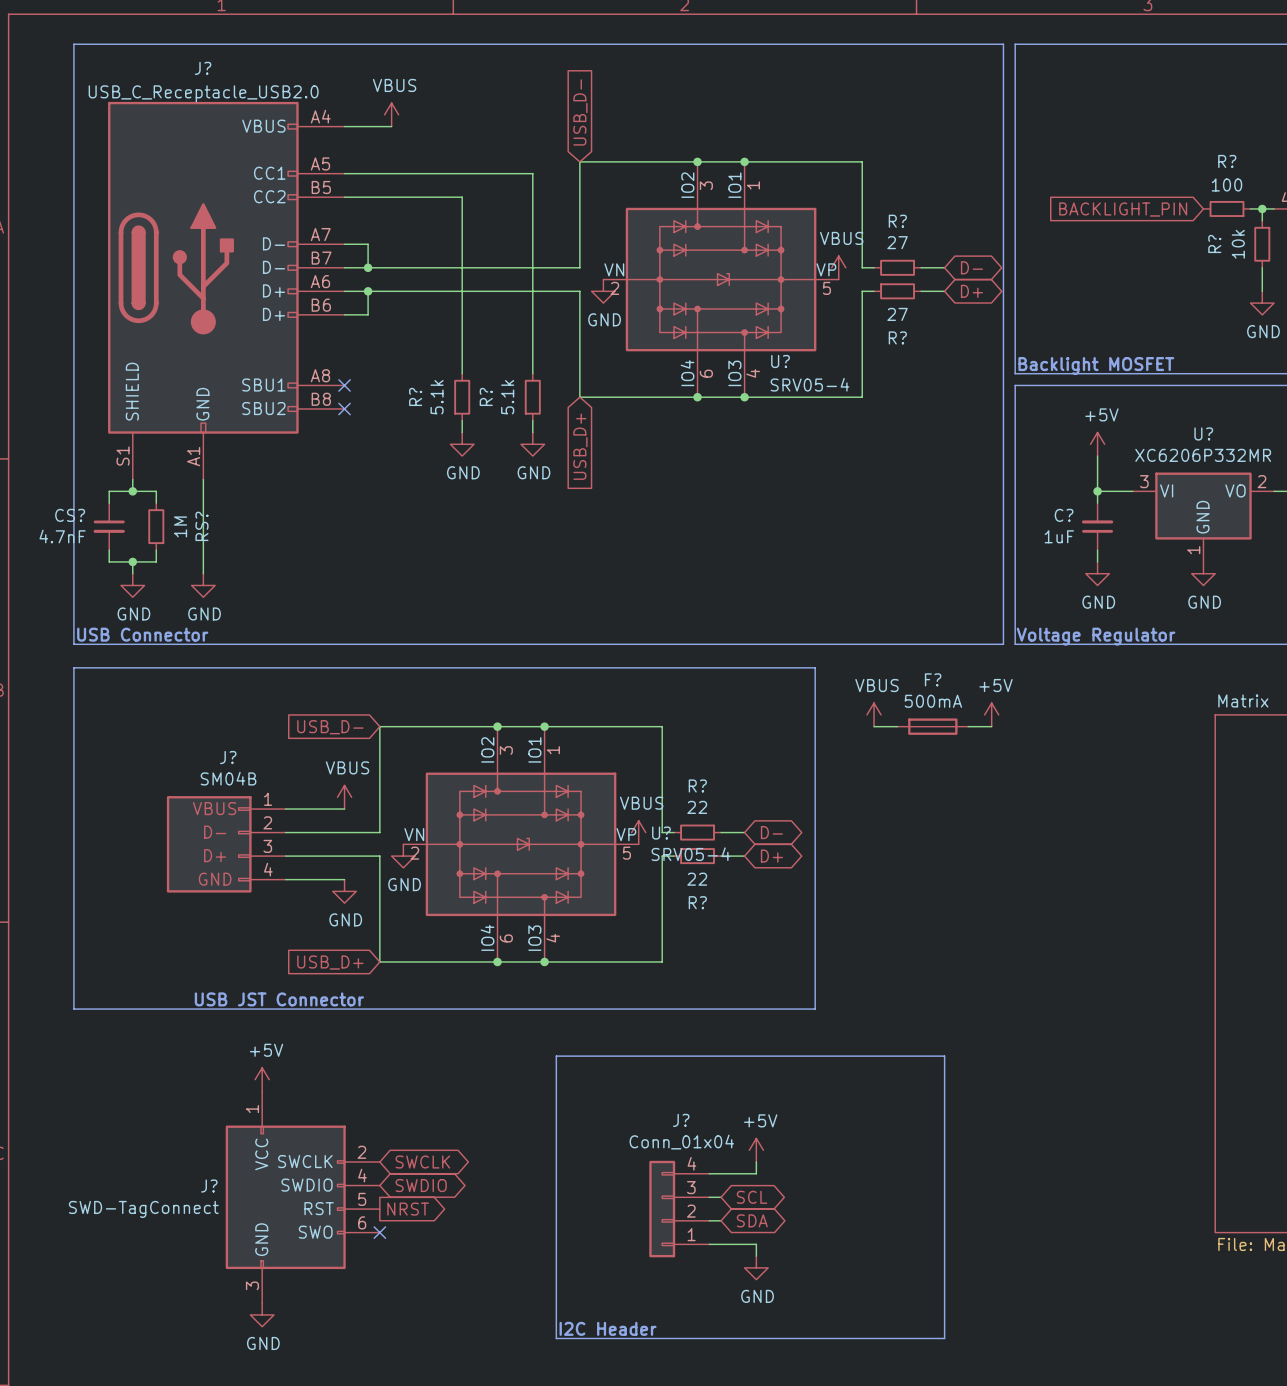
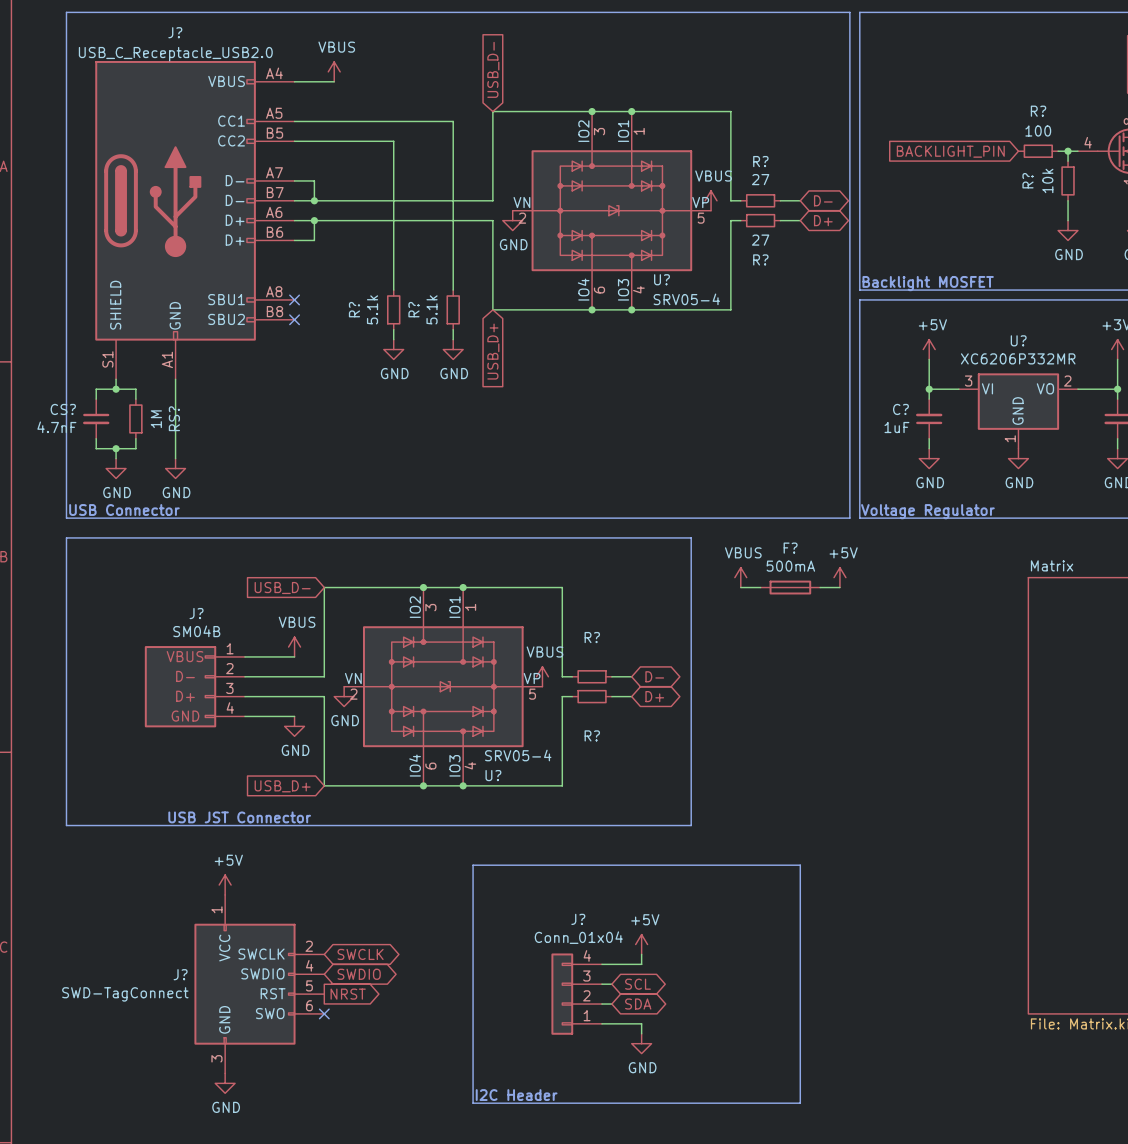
R? value: 22 (697, 807) -> none
U? name position: U? (661, 833) -> U? (493, 775)
U? value position: SRV05-4 (690, 854) -> SRV05-4 (518, 755)
R? value: 22 (697, 879) -> none

